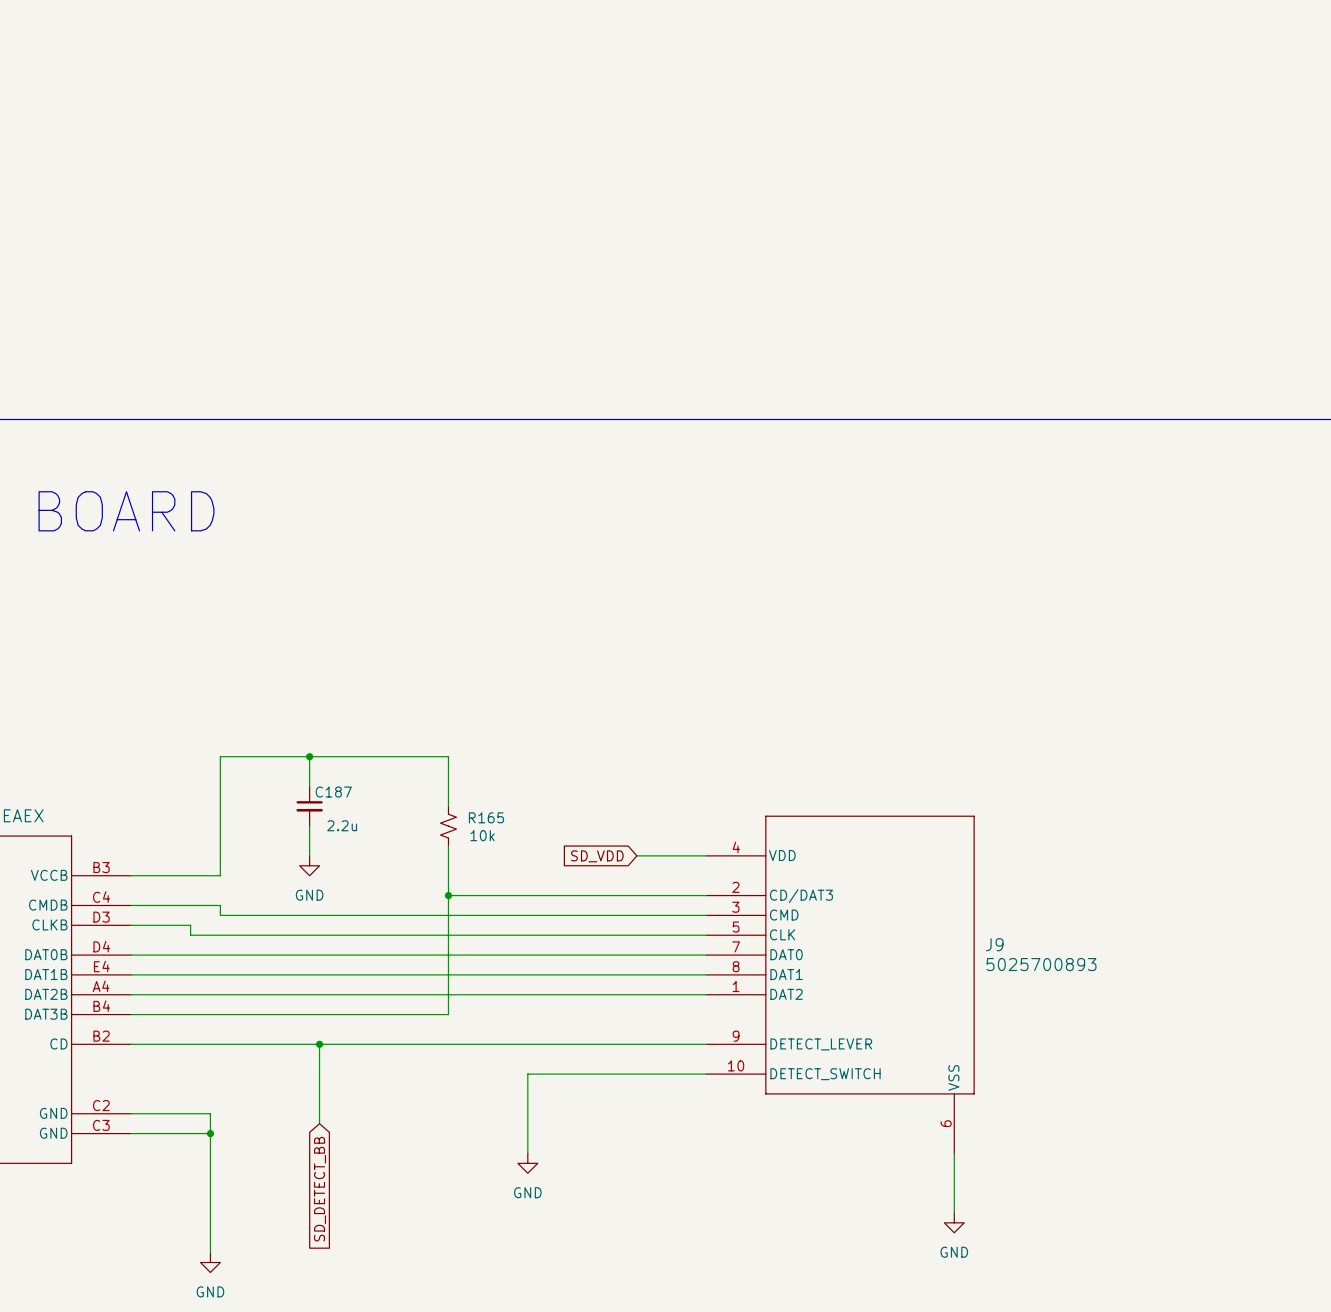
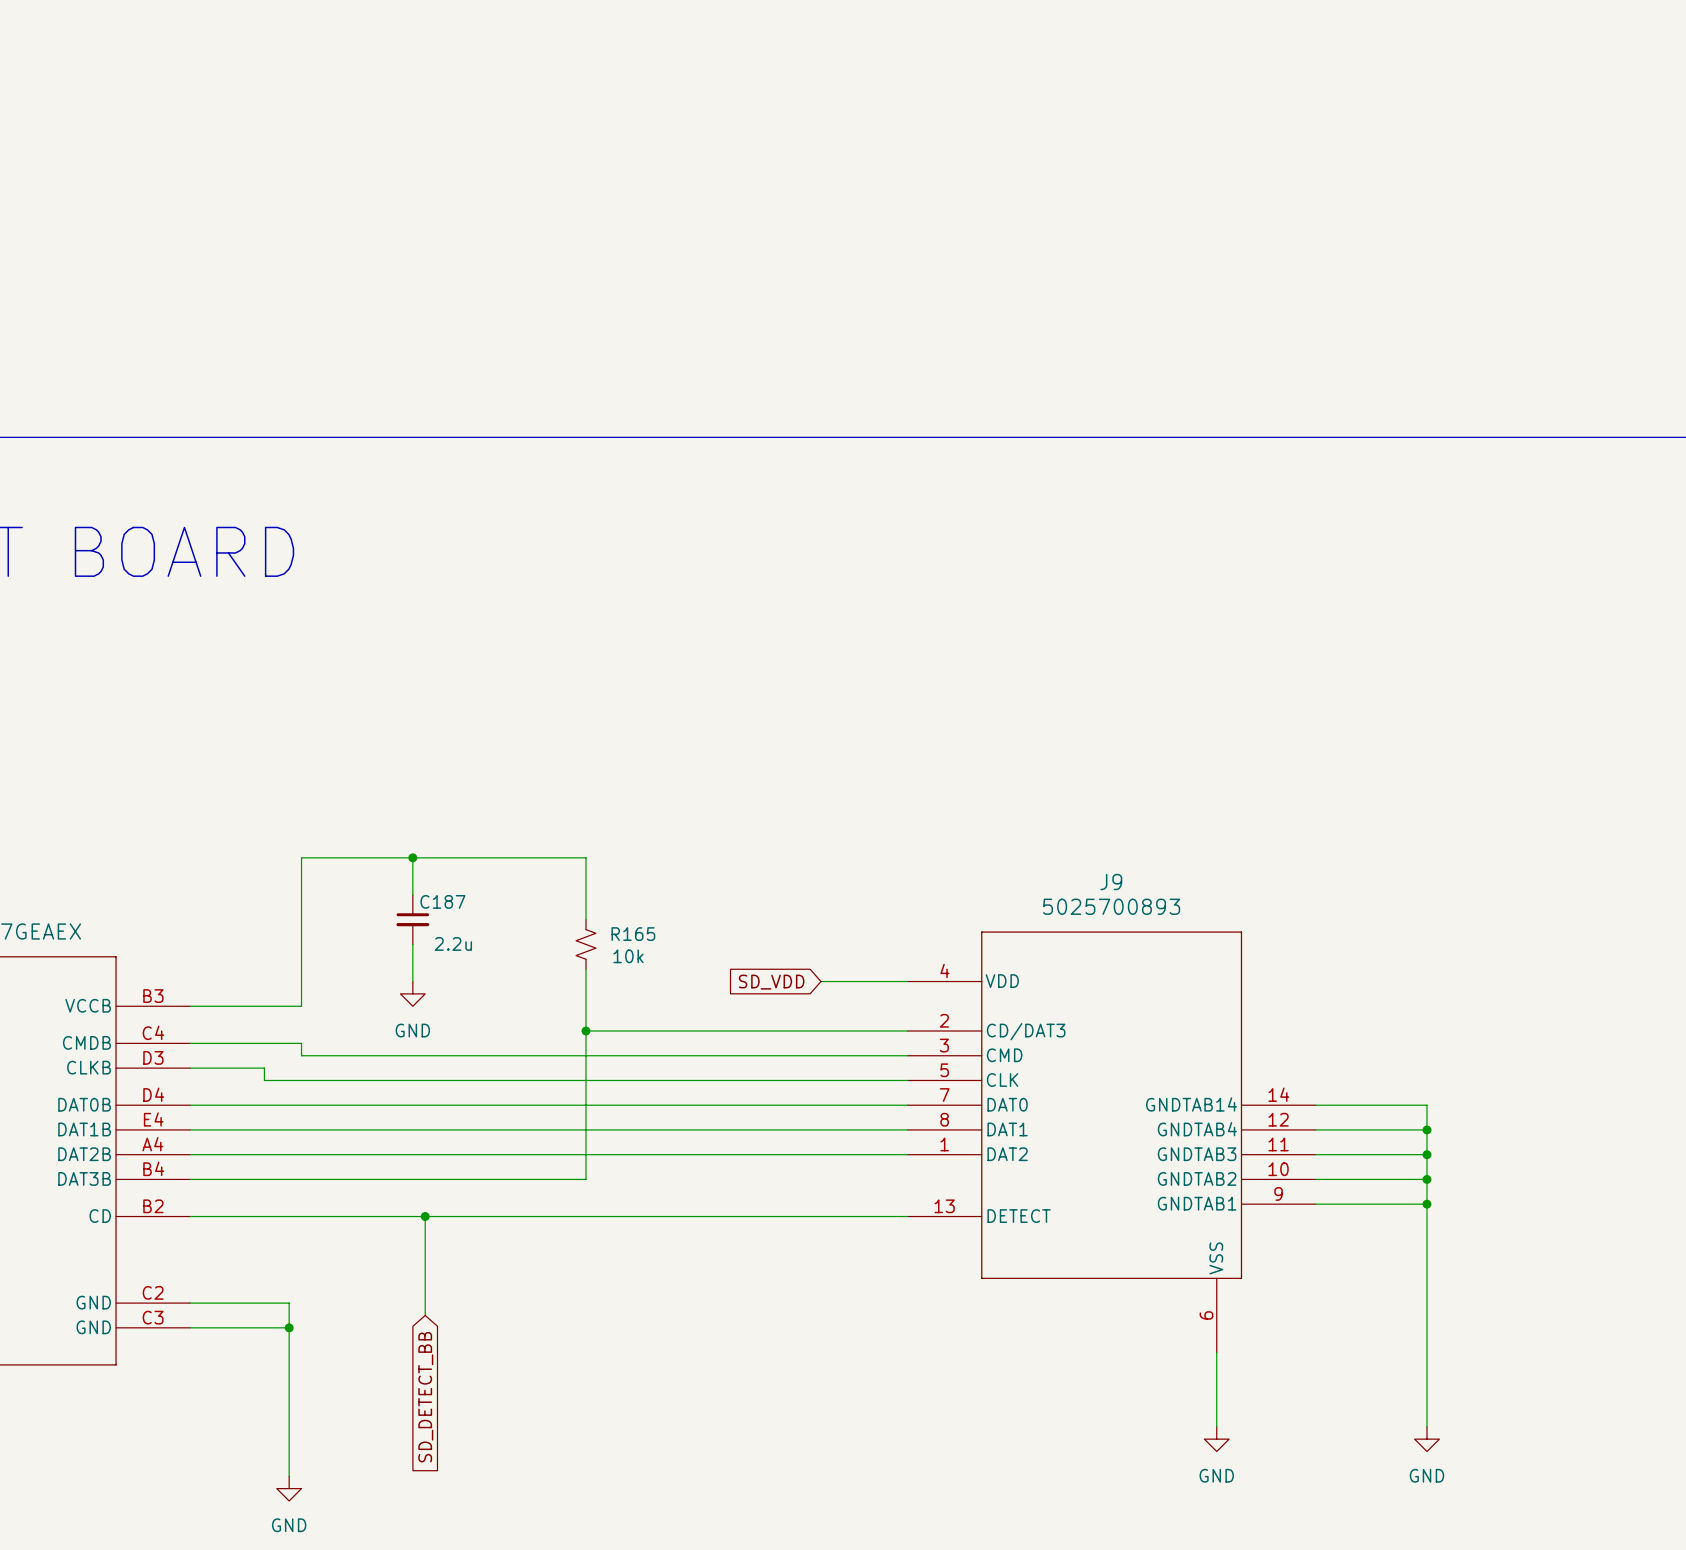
J9 symbol: [706, 815, 975, 1154] -> [907, 931, 1316, 1353]
J9 name position: J9 (994, 944) -> J9 (1111, 882)
wire: none -> (1315, 1105) (1426, 1105) (1426, 1426)
J9 value position: 5025700893 (1041, 964) -> 5025700893 (1111, 906)
wire: none -> (1315, 1129) (1426, 1129)
junction: none -> (1426, 1129)
wire: none -> (1315, 1154) (1426, 1154)
junction: none -> (1426, 1154)
wire: none -> (1315, 1179) (1426, 1179)
junction: none -> (1426, 1179)
wire: none -> (1315, 1204) (1426, 1204)
junction: none -> (1426, 1204)
wire: (706, 1074) (527, 1074) (527, 1153) -> none
power symbol: GND (527, 1163) -> none
power symbol: none -> GND (1426, 1439)

